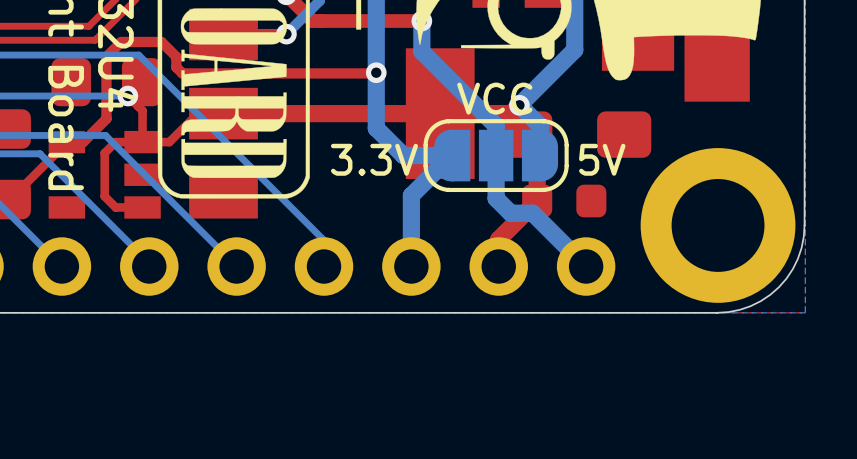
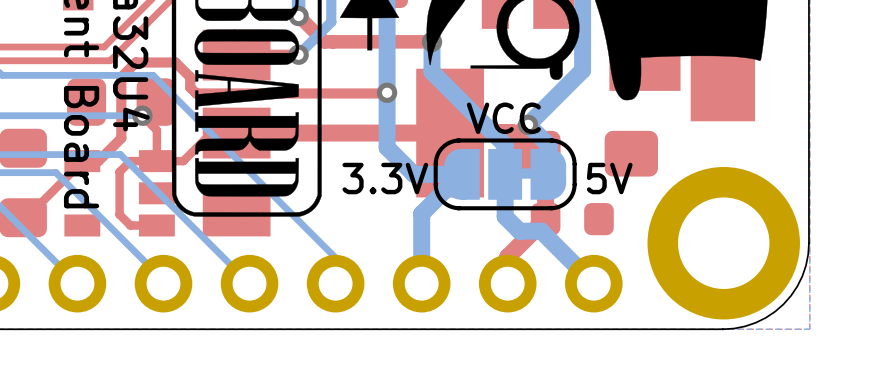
part footprint: [423, 119, 569, 193] -> [433, 138, 577, 211]

